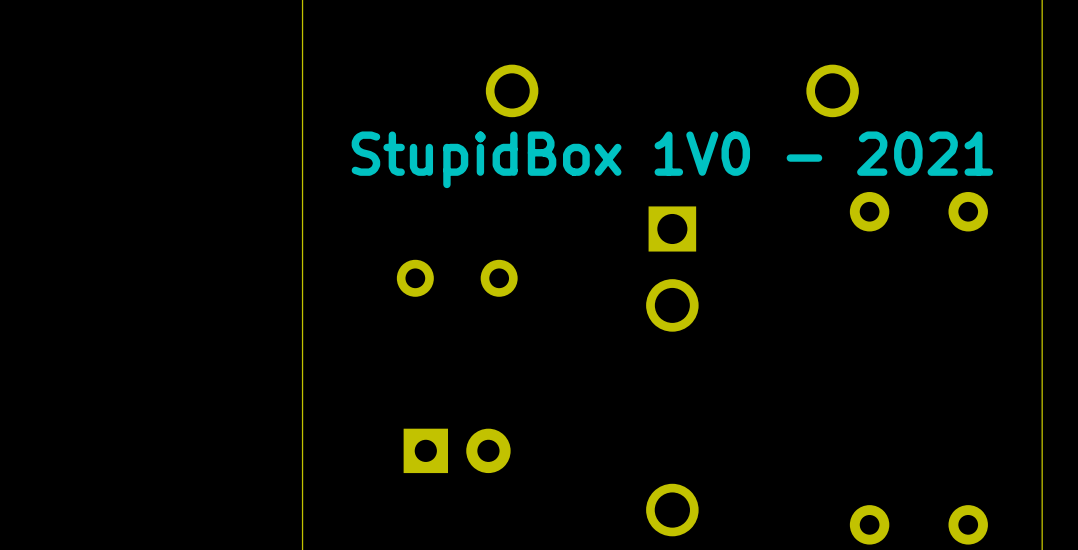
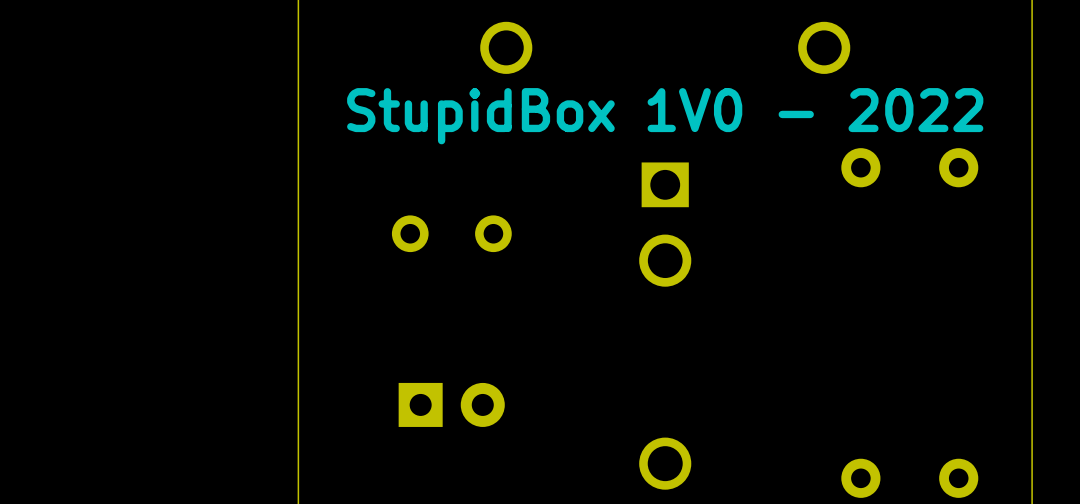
text: StupidBox 1V0 - 2021 (672, 159) -> StupidBox 1V0 - 2022 (665, 116)

